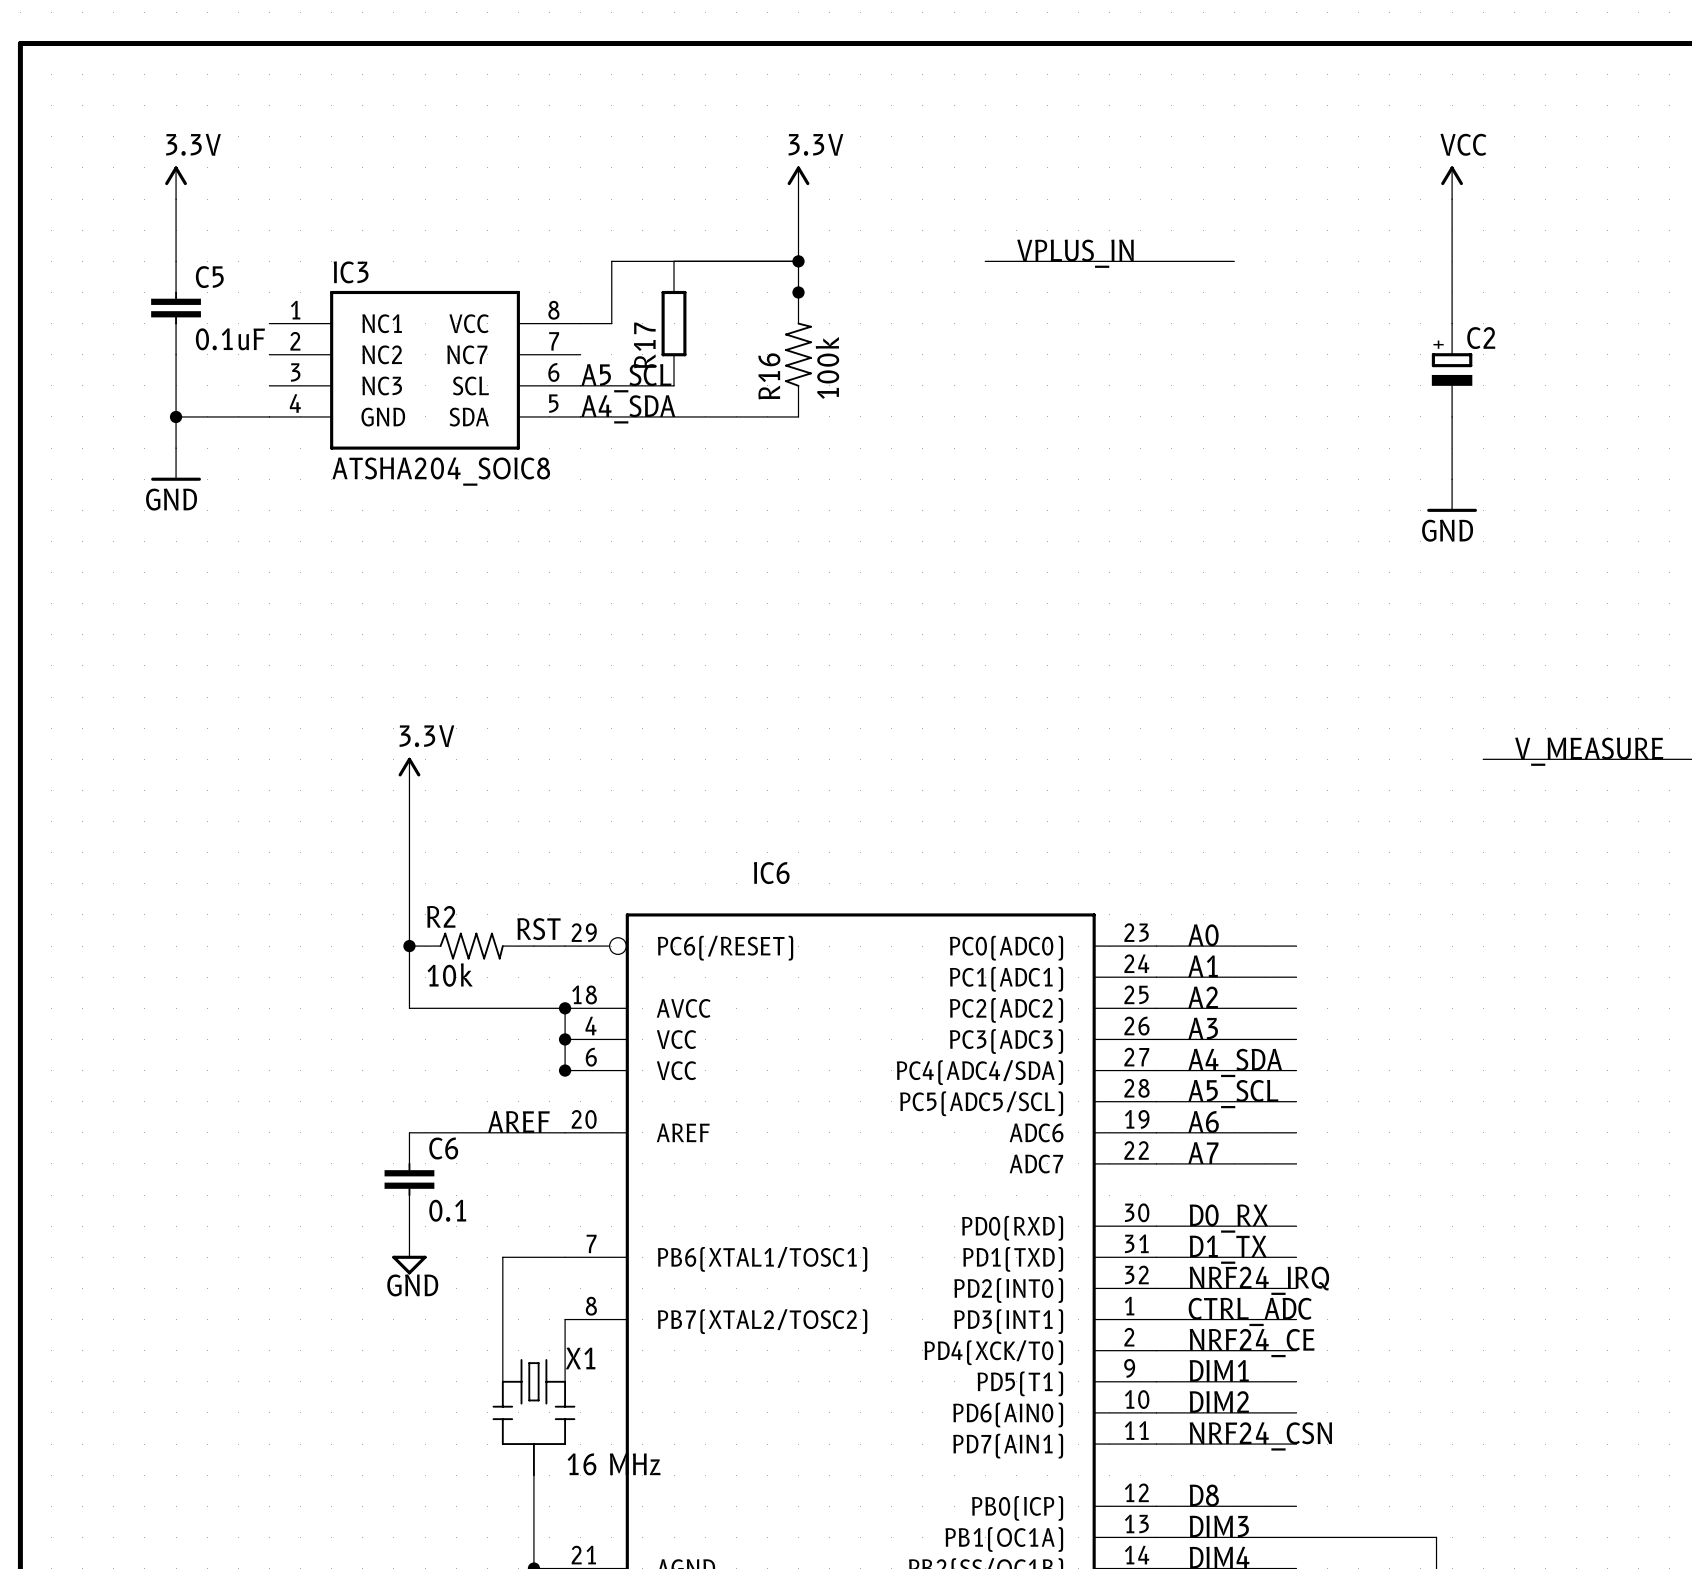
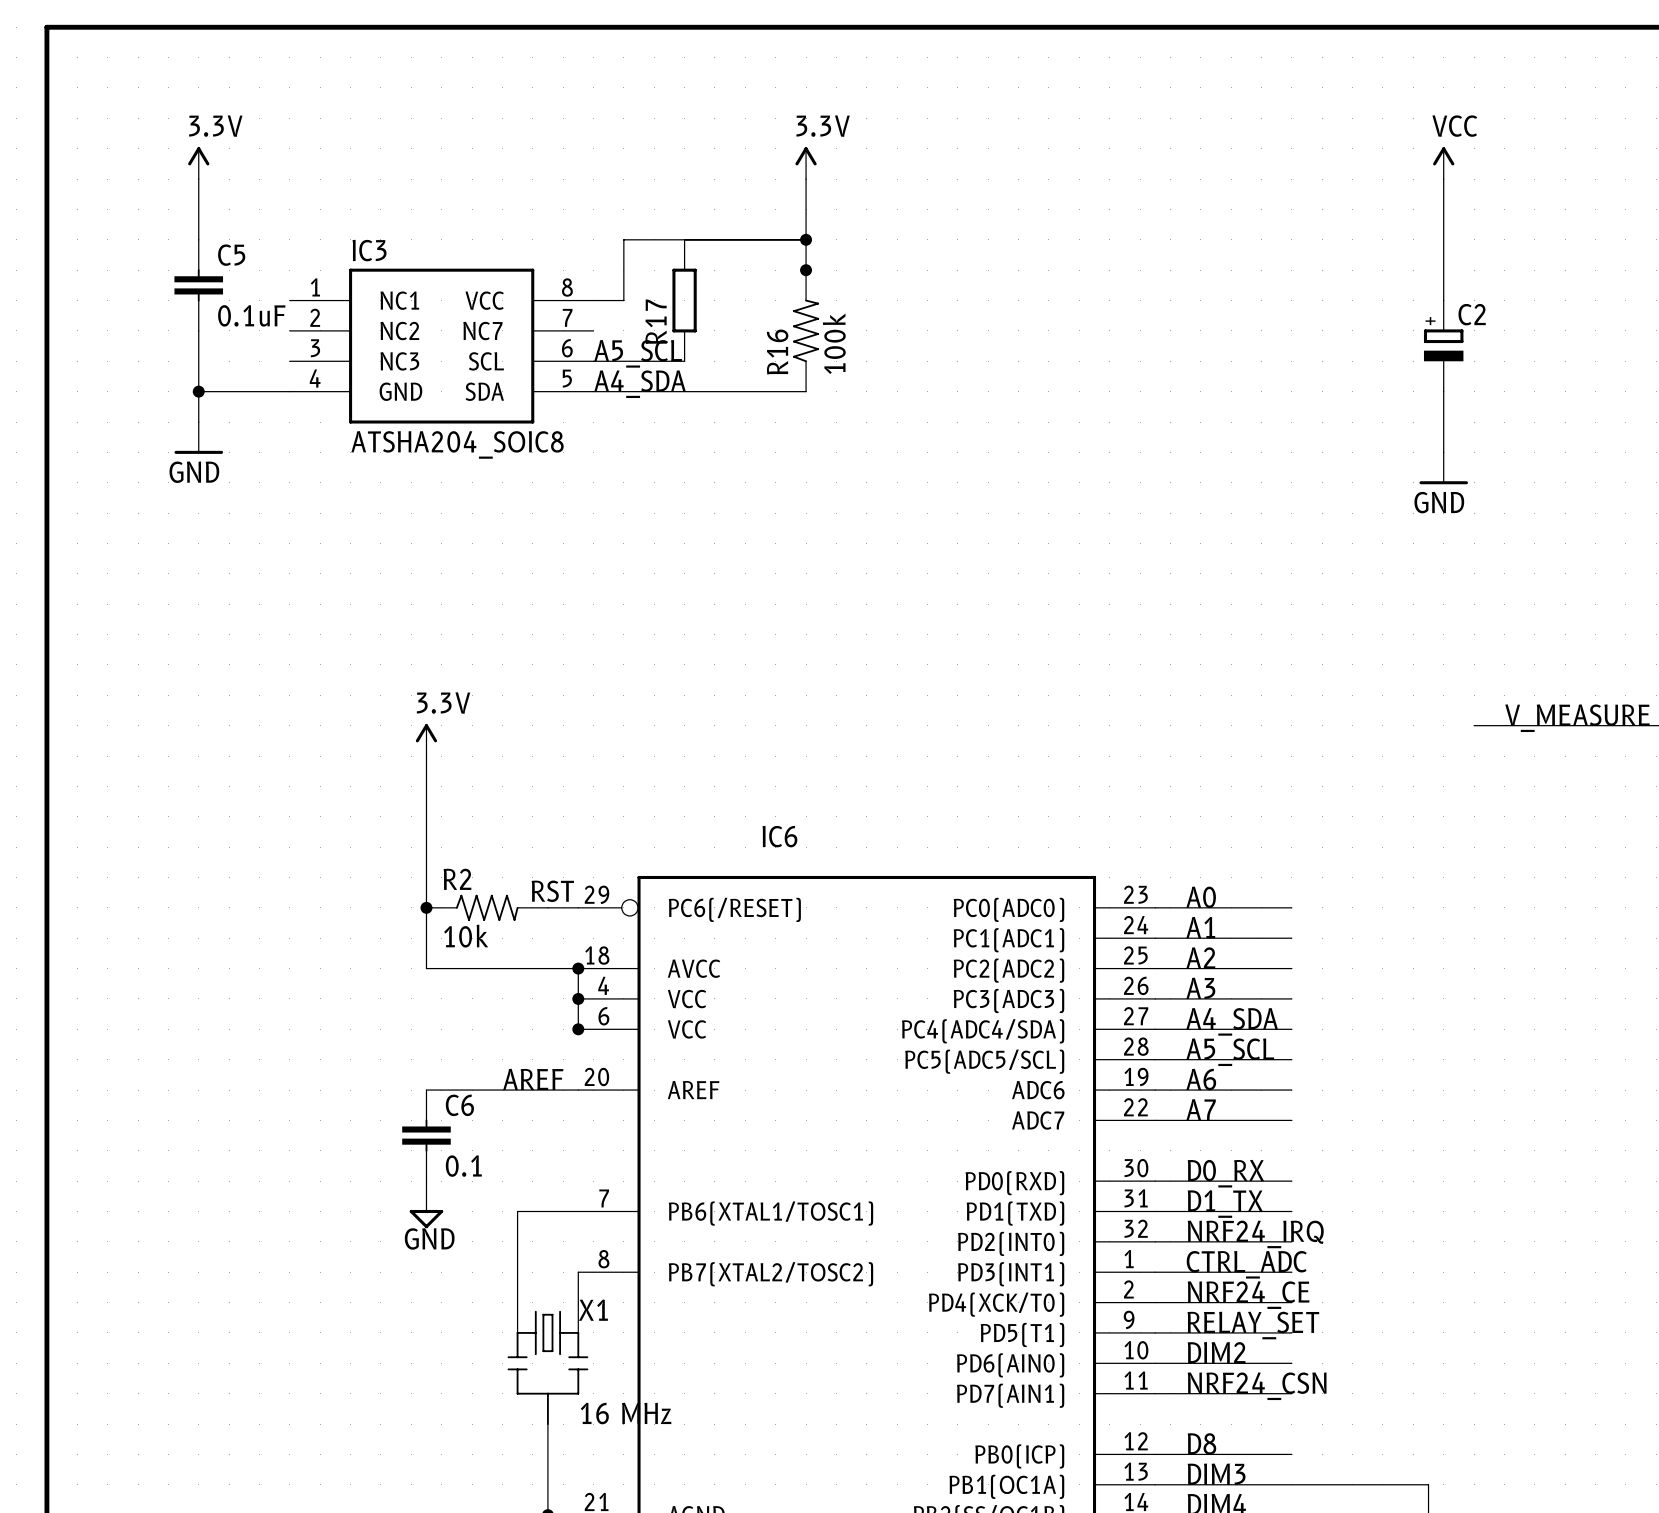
label: VPLUS_IN (1075, 253) -> none
wire: (985, 261) (1234, 261) -> none
label: DIM1 (1219, 1370) -> RELAY_SET (1253, 1325)

